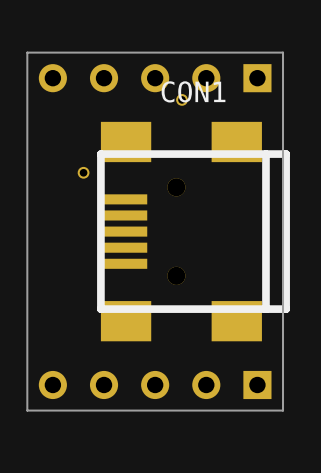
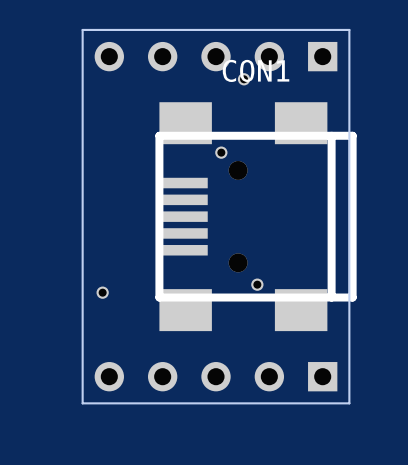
part: none -> (221, 152)
part: (83, 172) -> none
part: none -> (257, 284)
part: none -> (102, 292)

